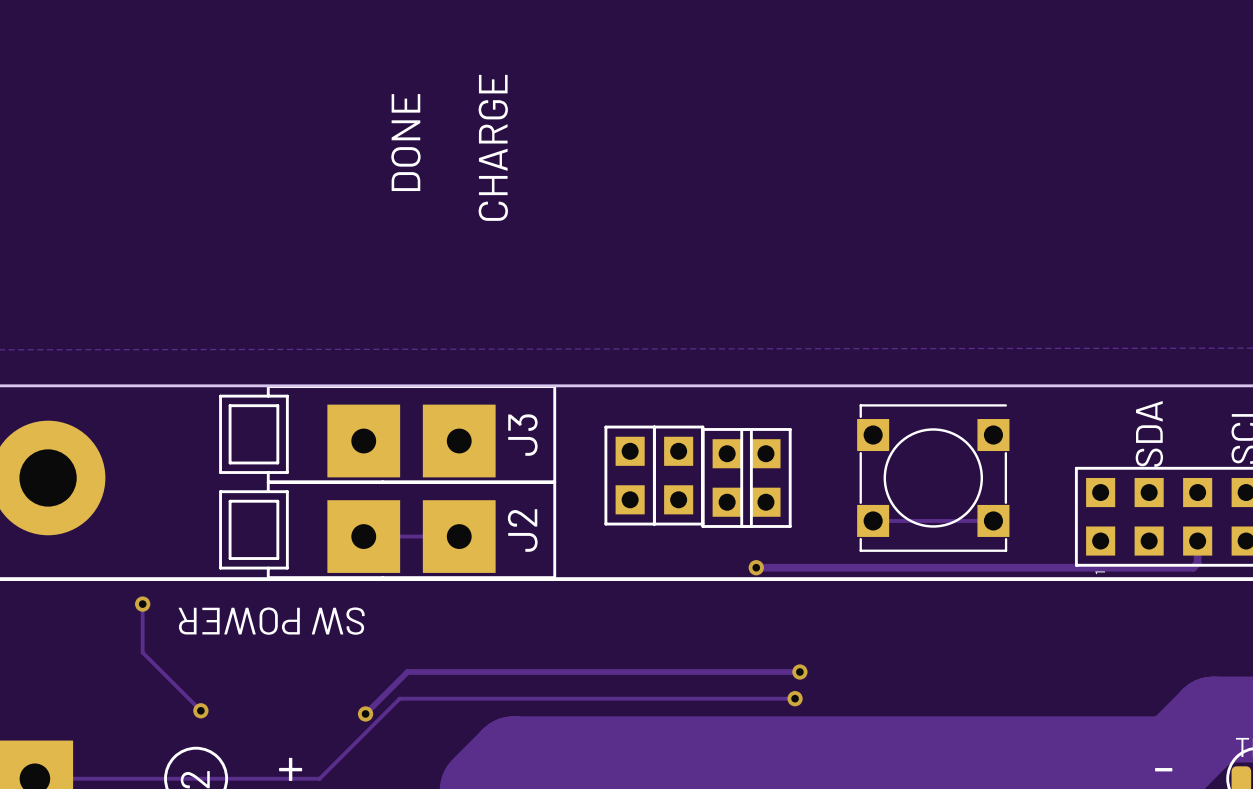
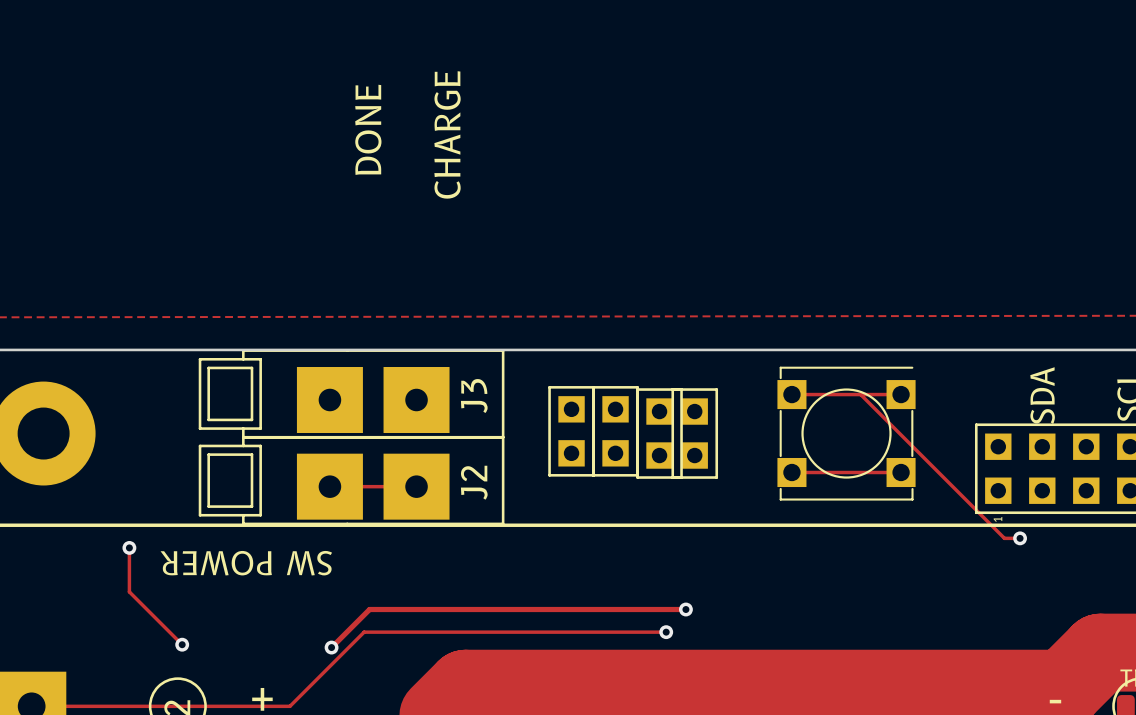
track: none -> (791, 394) (901, 394)
track: none -> (860, 394) (1004, 538) (1020, 538)
track: (1197, 541) (1197, 563) (1193, 567) (756, 567) -> none
via: (756, 567) -> none
via: none -> (1020, 538)
track: (756, 672) (799, 672) -> none
via: none -> (685, 609)
via: (799, 672) -> none
via: none -> (666, 632)
track: (399, 698) (795, 698) -> (362, 633) (364, 632) (666, 632)
via: (795, 698) -> none

